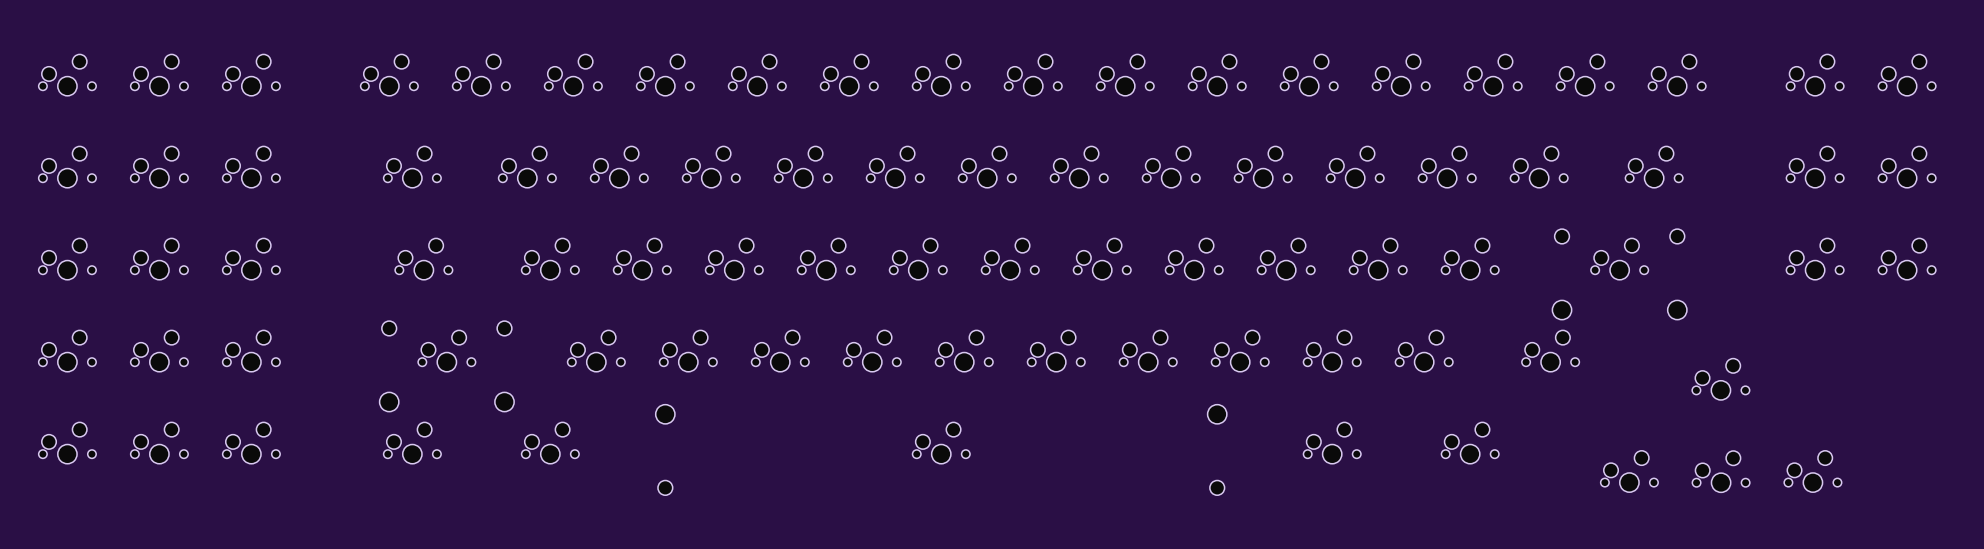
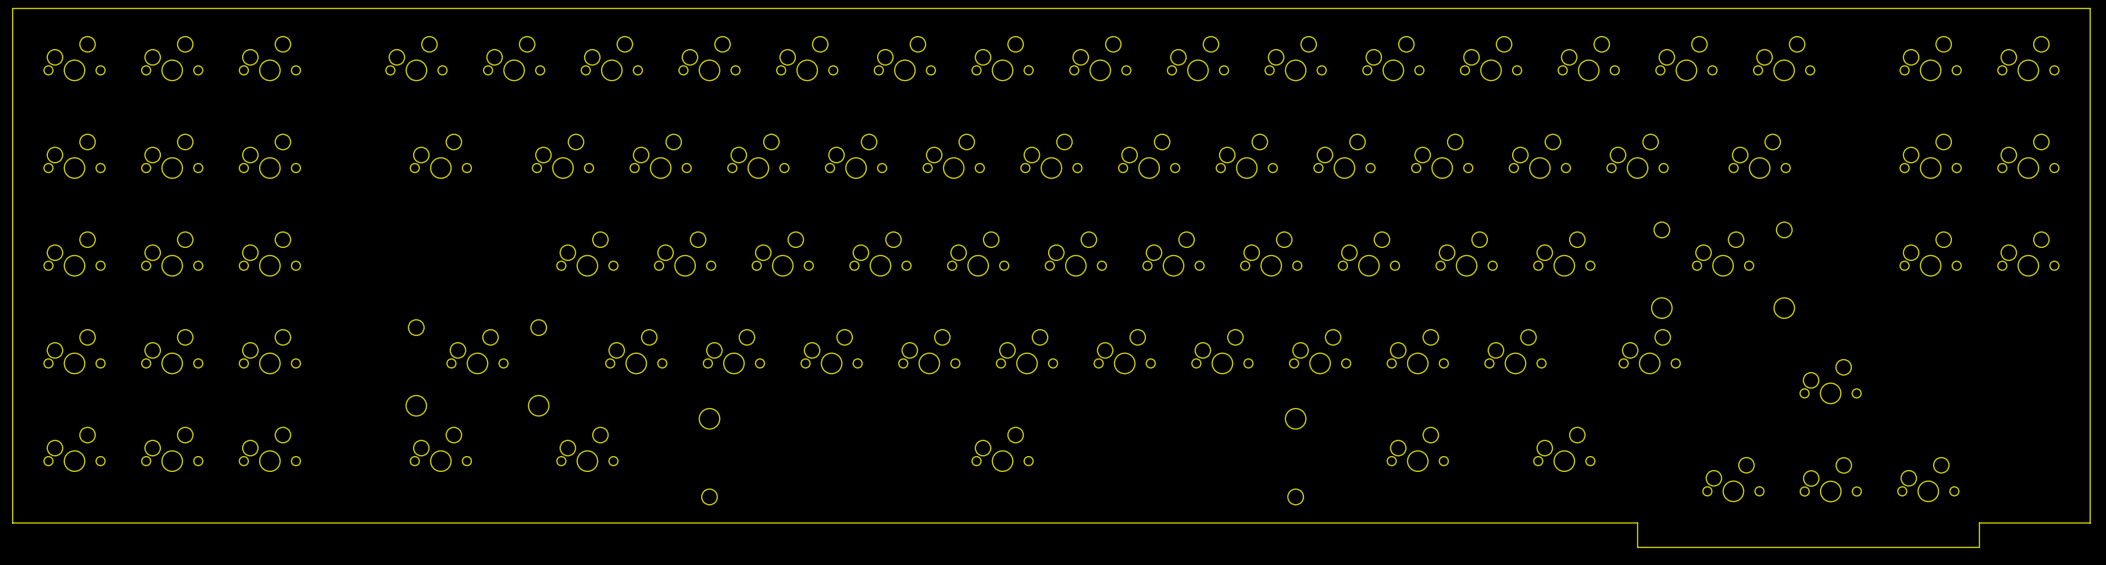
board edge: none -> (12, 8) (2090, 8) (2090, 522) (1979, 522) (1979, 547) (1637, 547) (1637, 522) (12, 522) (12, 8)
part: (423, 259) -> none

